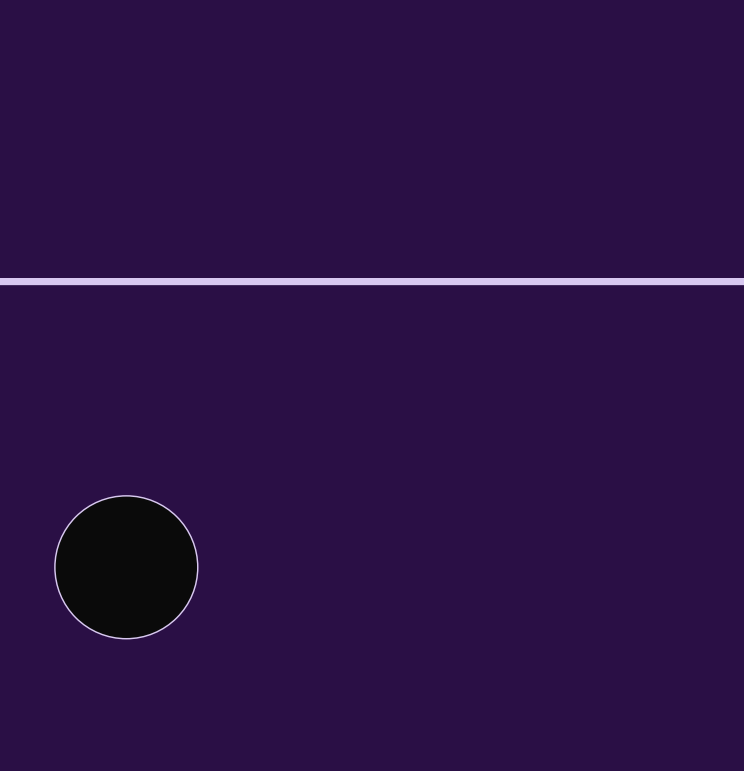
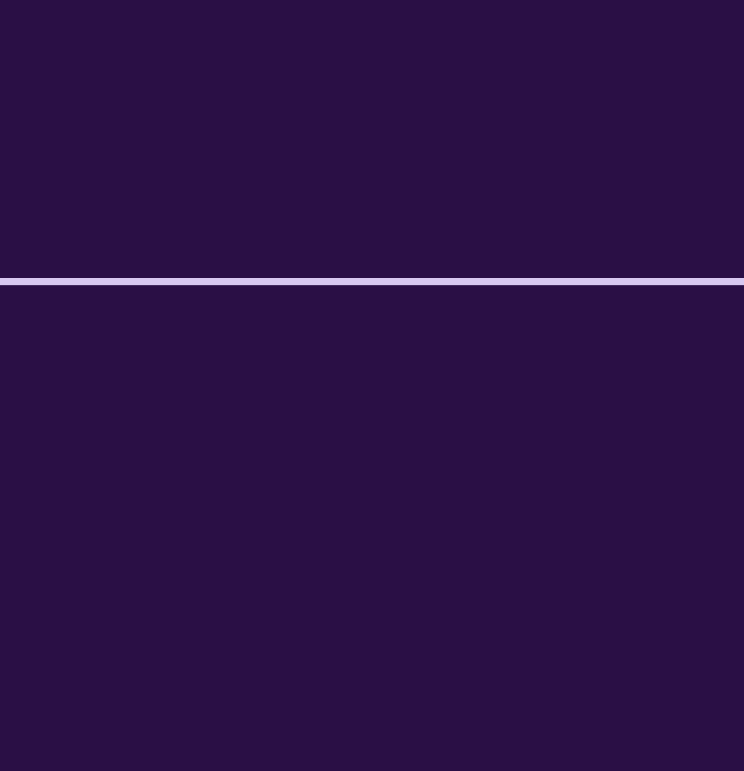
part: (126, 567) -> none

